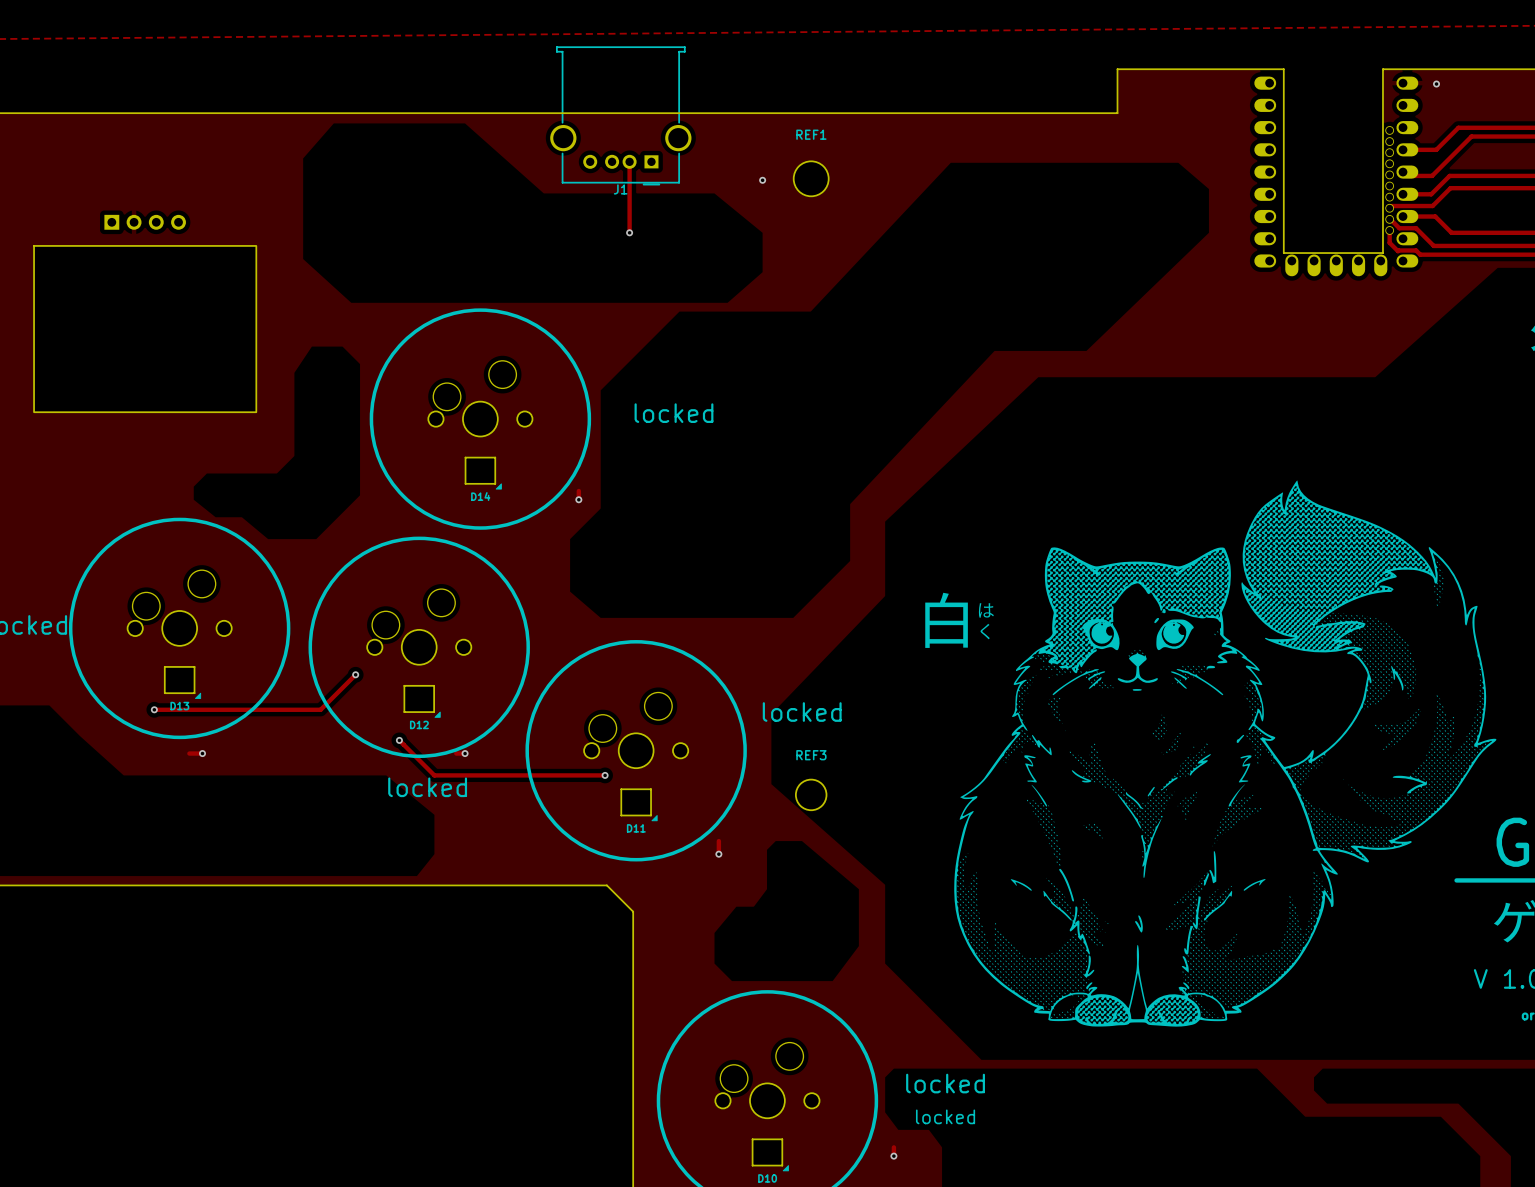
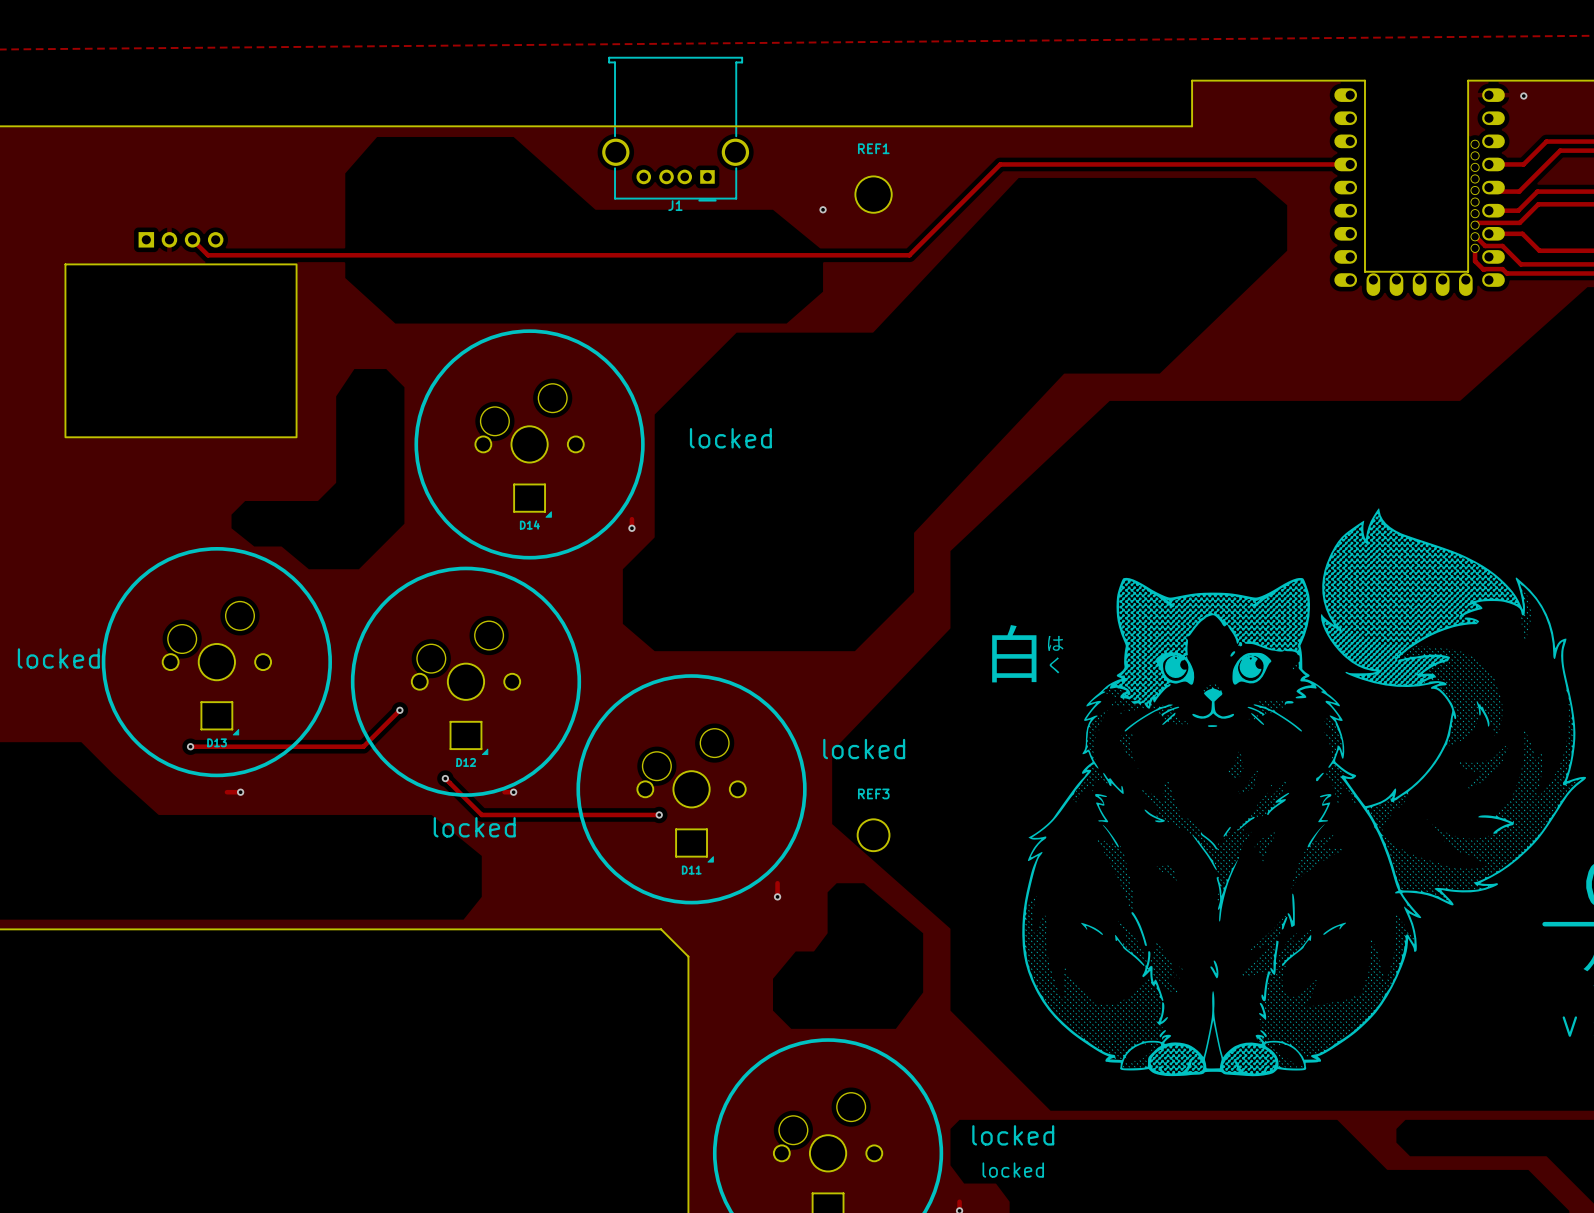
track: none -> (1350, 164) (1000, 164) (909, 255) (208, 255) (192, 239)
track: (629, 161) (629, 232) -> none
via position: (762, 180) -> (823, 209)
via: (629, 232) -> none

